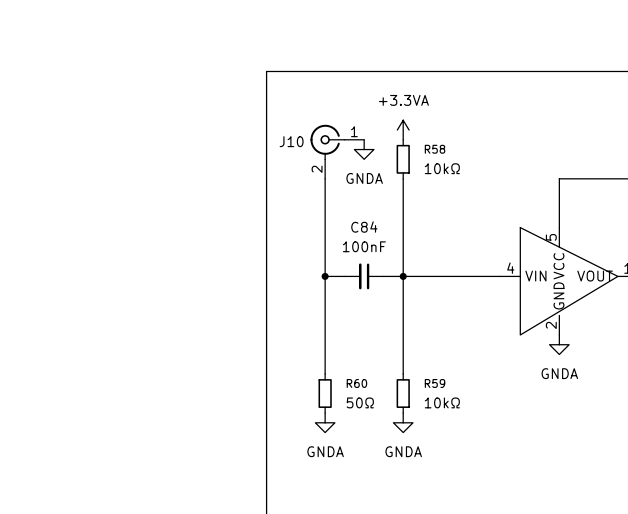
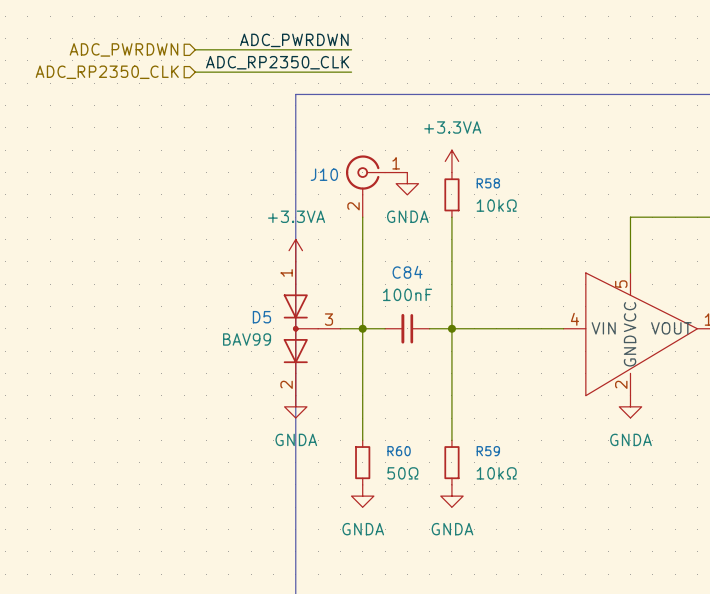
label: none -> ADC_PWRDWN (294, 40)
hierarchical label: none -> ADC_PWRDWN (123, 49)
wire: none -> (195, 49) (351, 49)
label: none -> ADC_RP2350_CLK (277, 62)
wire: none -> (195, 72) (351, 72)
hierarchical label: none -> ADC_RP2350_CLK (107, 72)
power symbol: none -> +3.3VA (295, 250)
D5: none -> BAV99 (312, 328)
wire: none -> (340, 328) (362, 328)
power symbol: none -> GNDA (295, 406)

